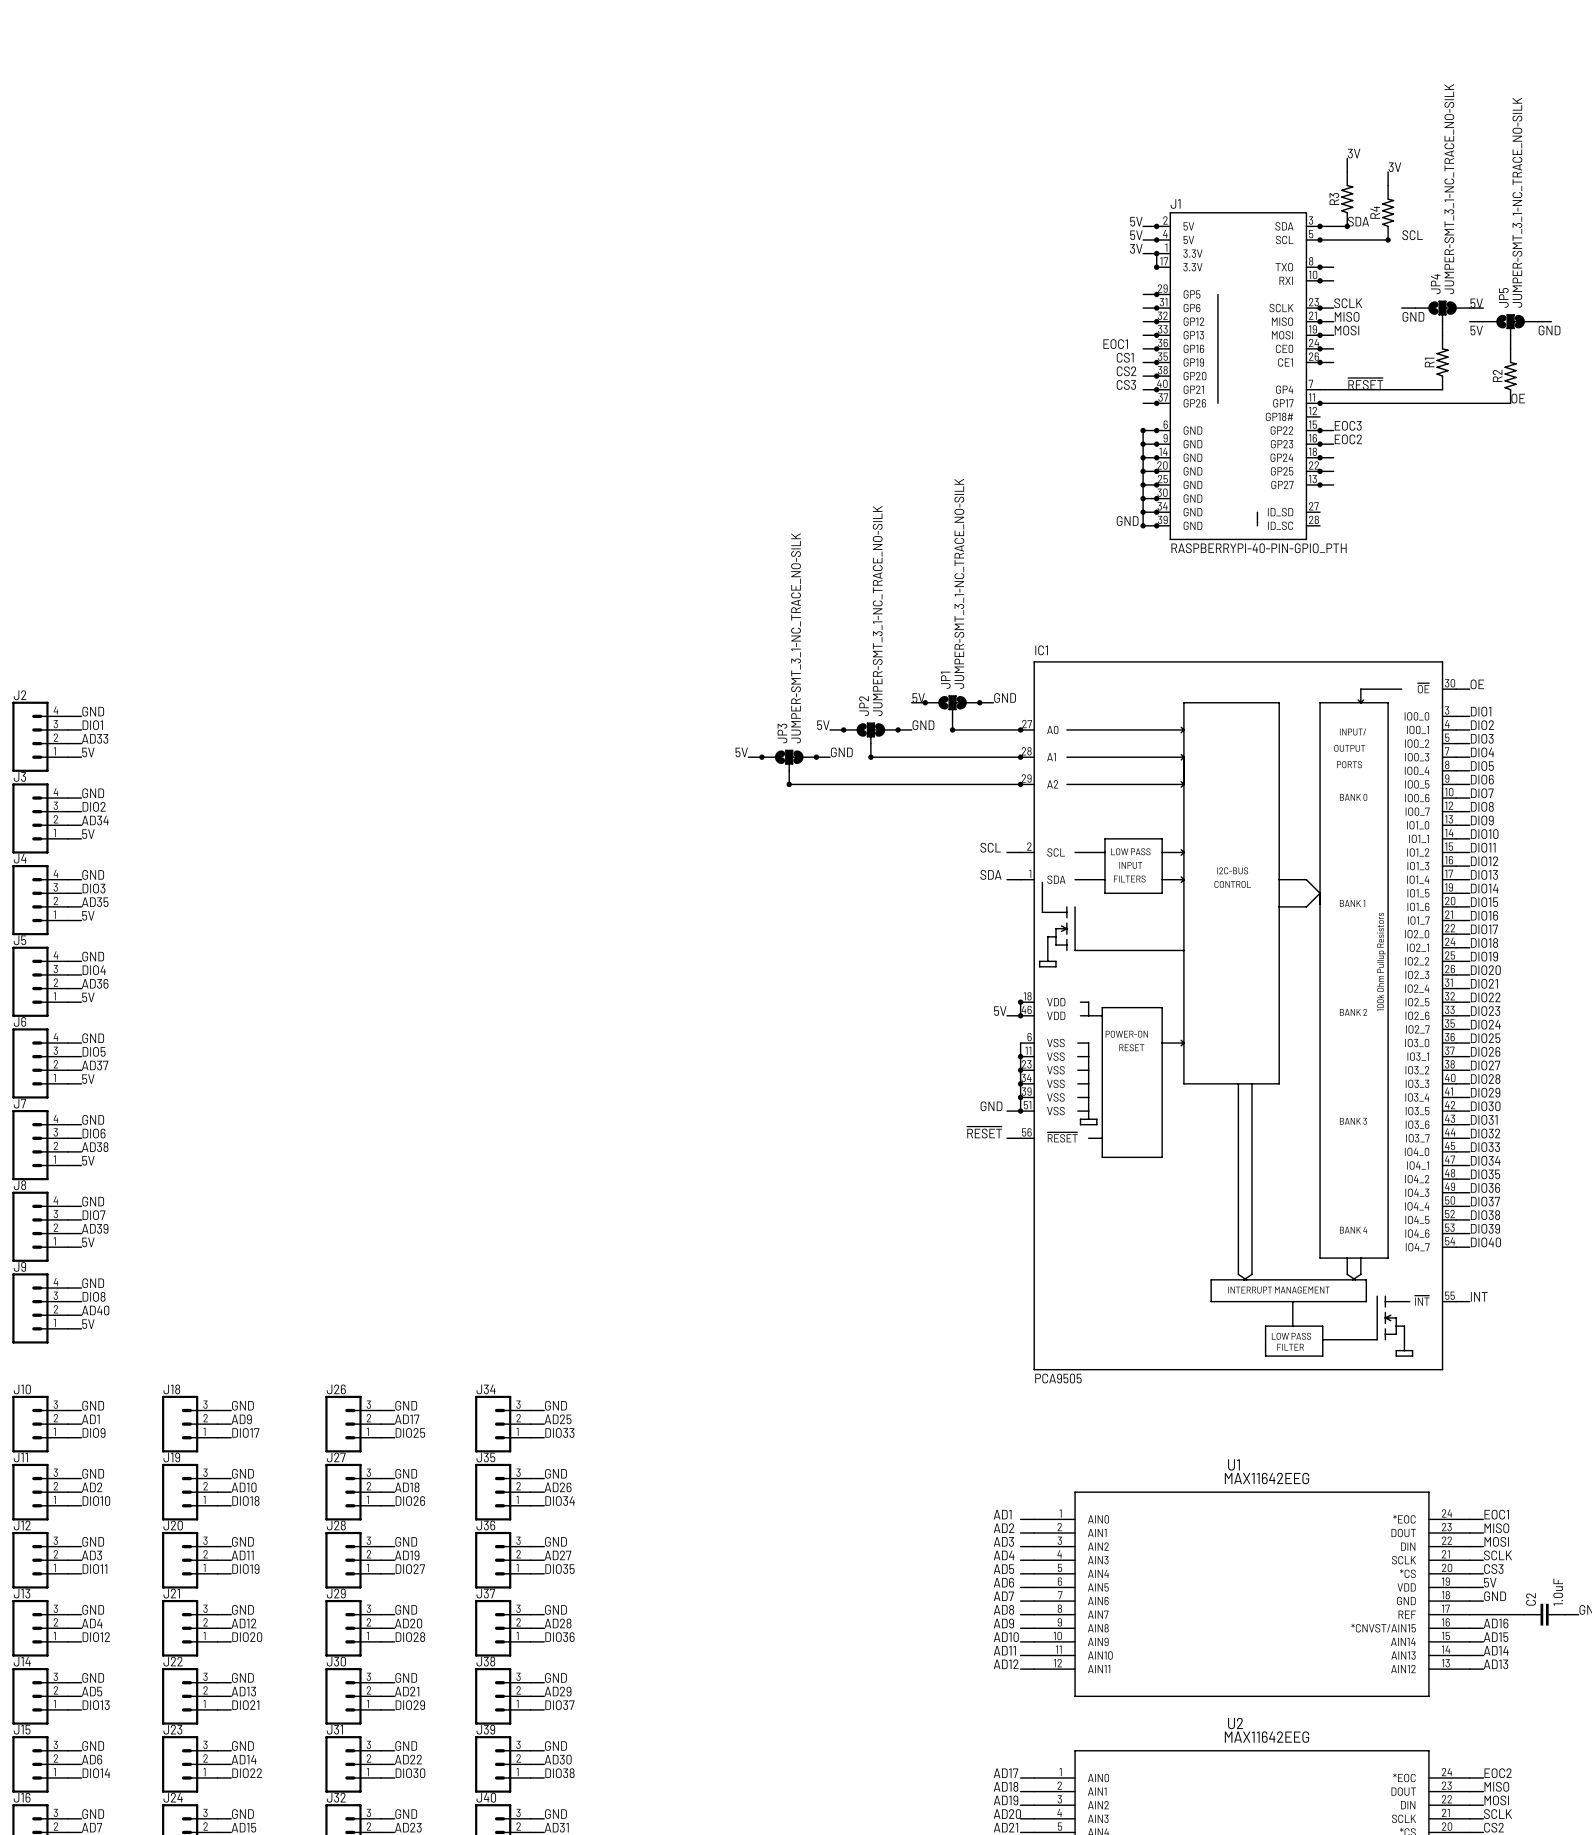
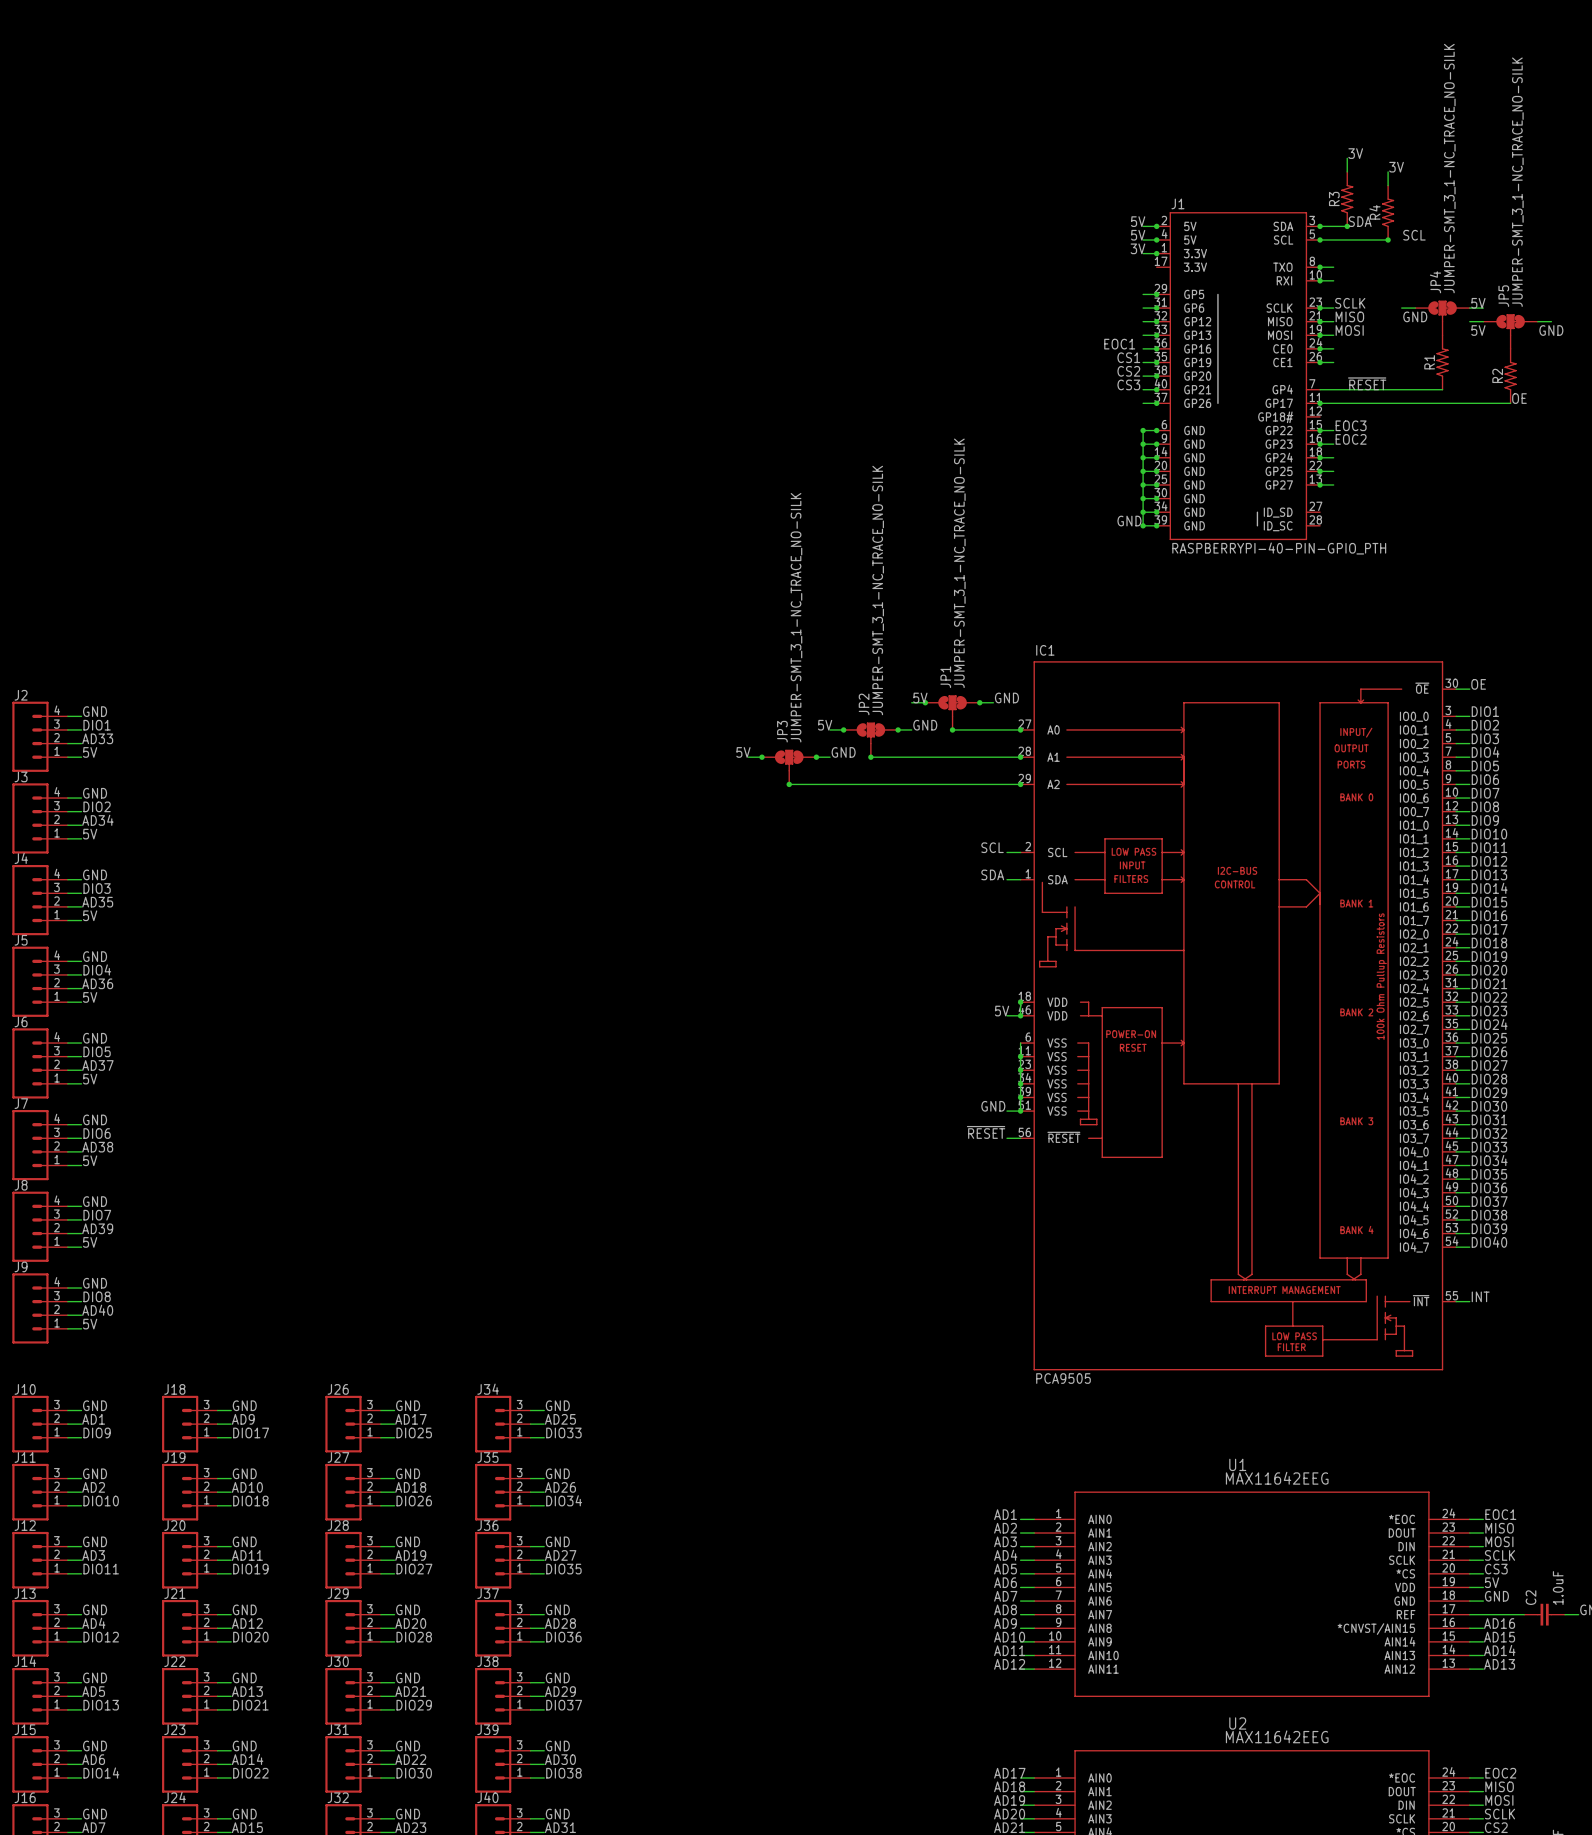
wire: (1156, 253) (1156, 267) -> none
junction: (1156, 267) -> none

